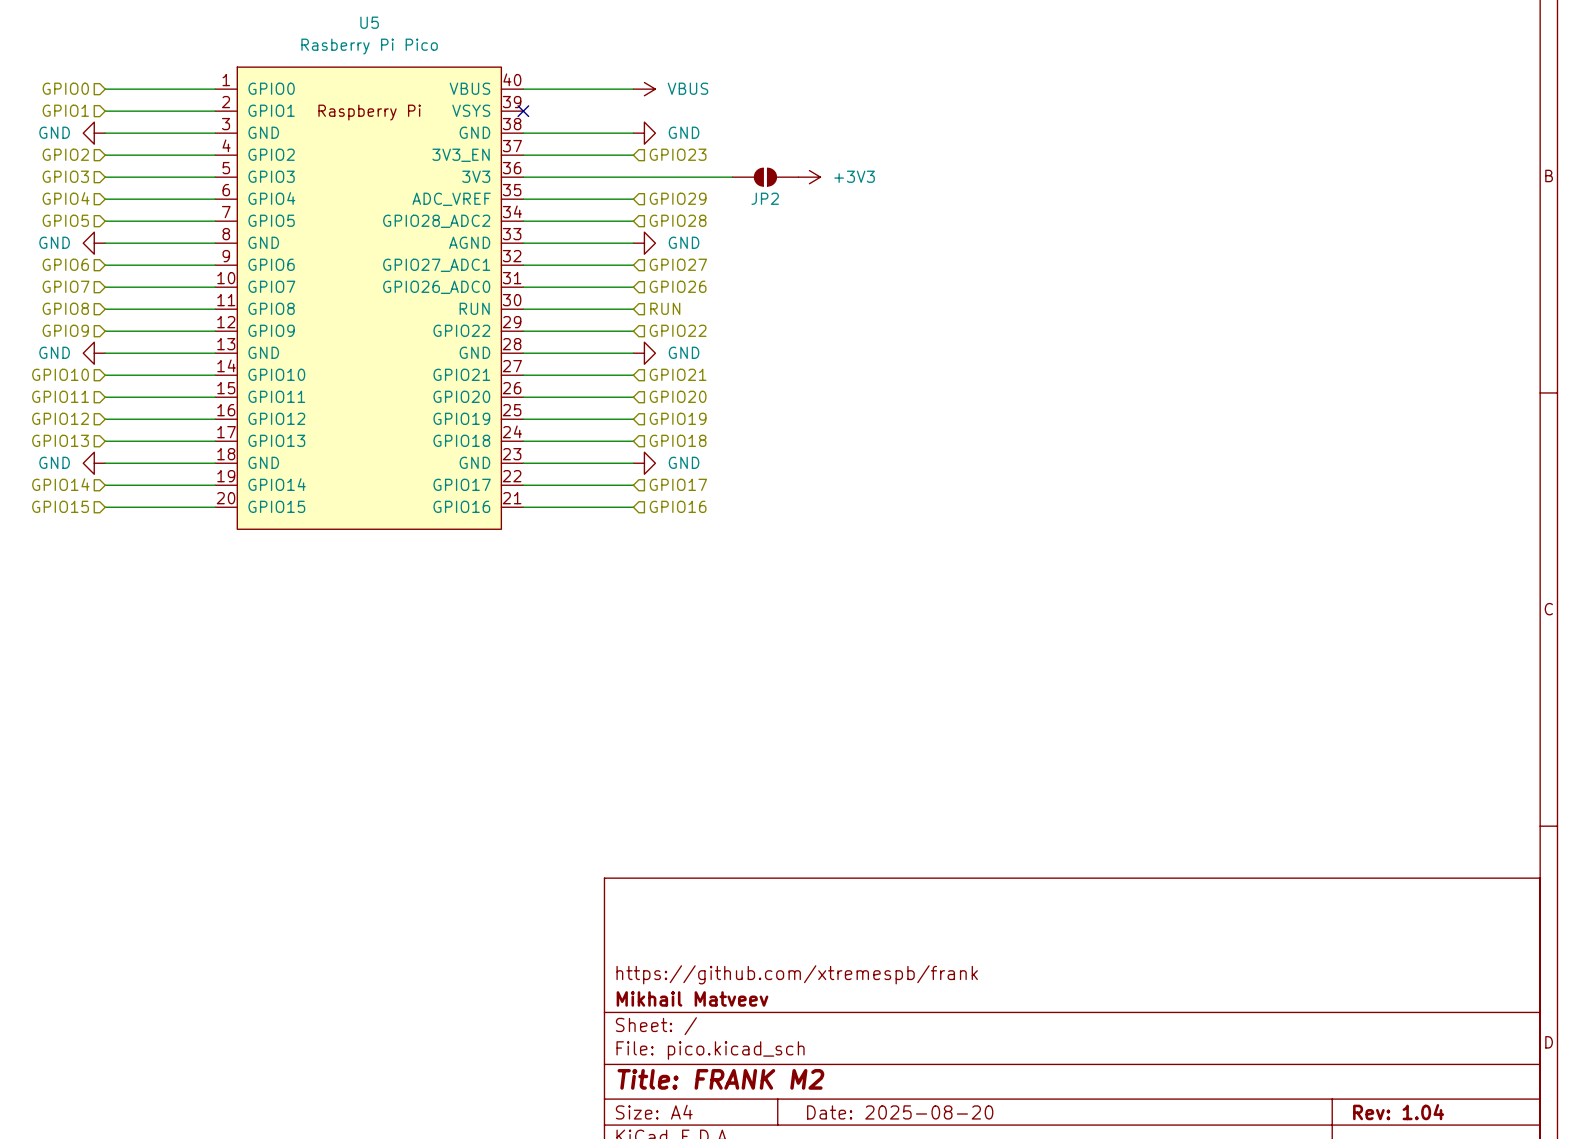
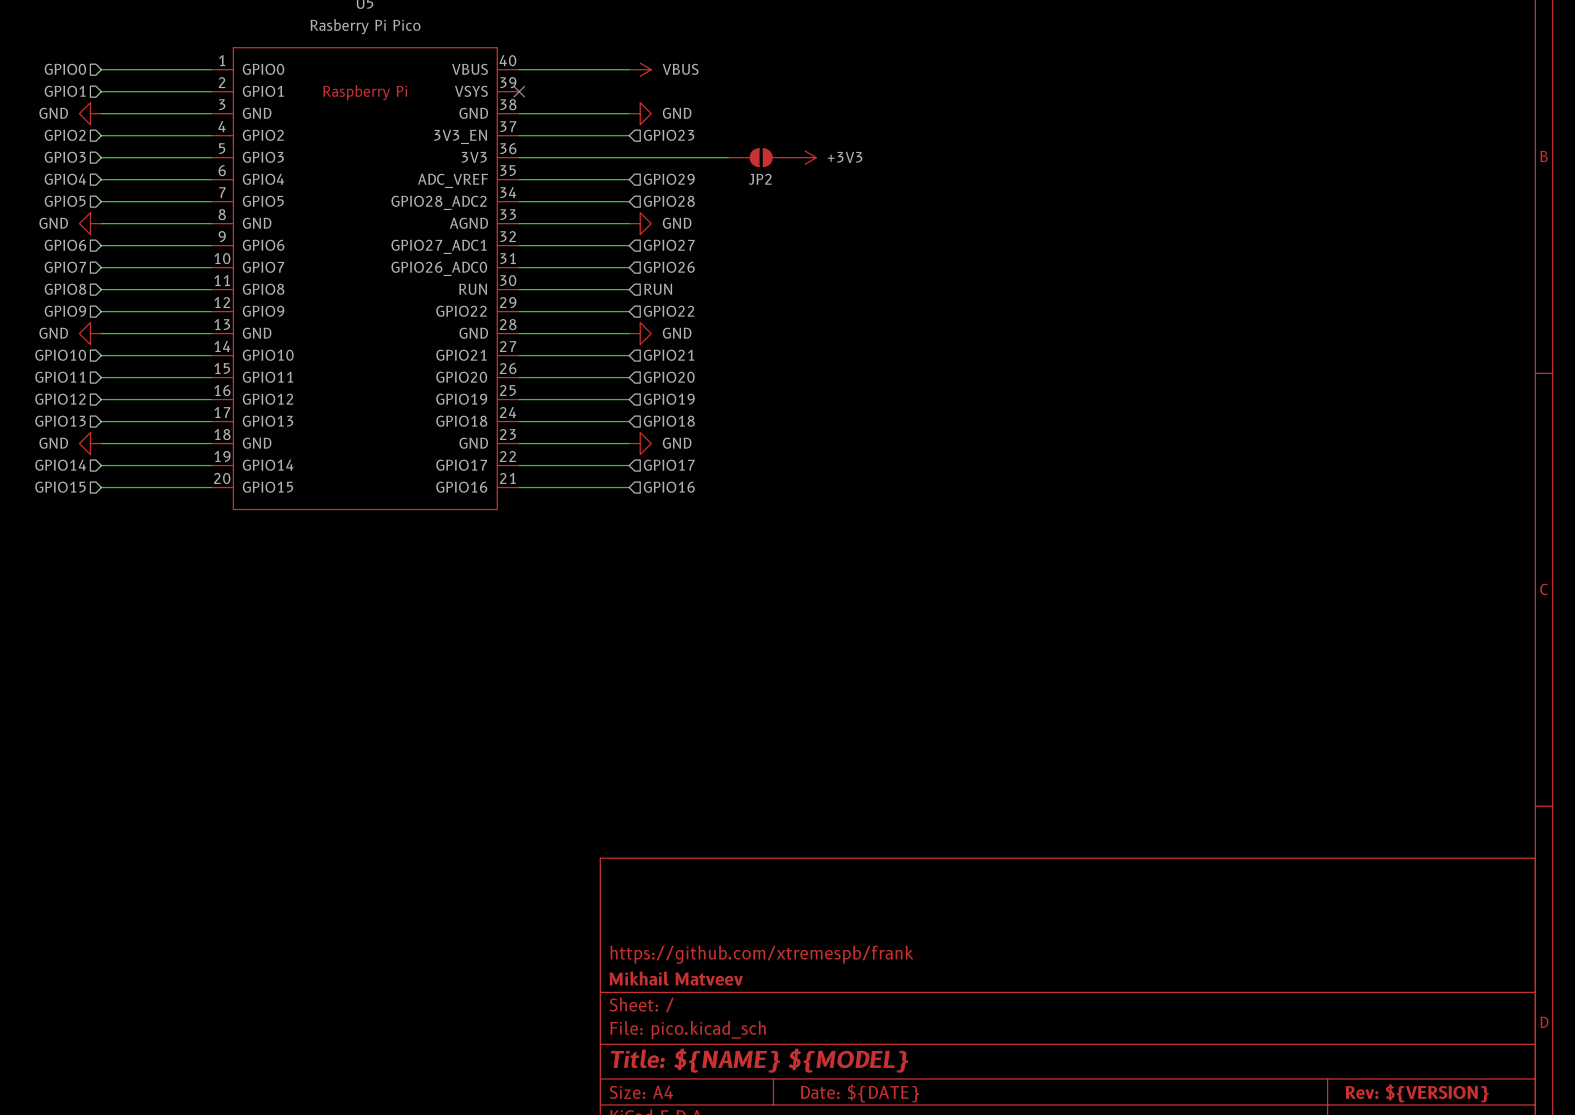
title block: Title: FRANK M2 (720, 1079) -> Title: ${NAME} ${MODEL} (759, 1060)
title block: Date: 2025-08-20 (900, 1112) -> Date: ${DATE} (860, 1093)
title block: Rev: 1.04 (1398, 1112) -> Rev: ${VERSION} (1417, 1093)

